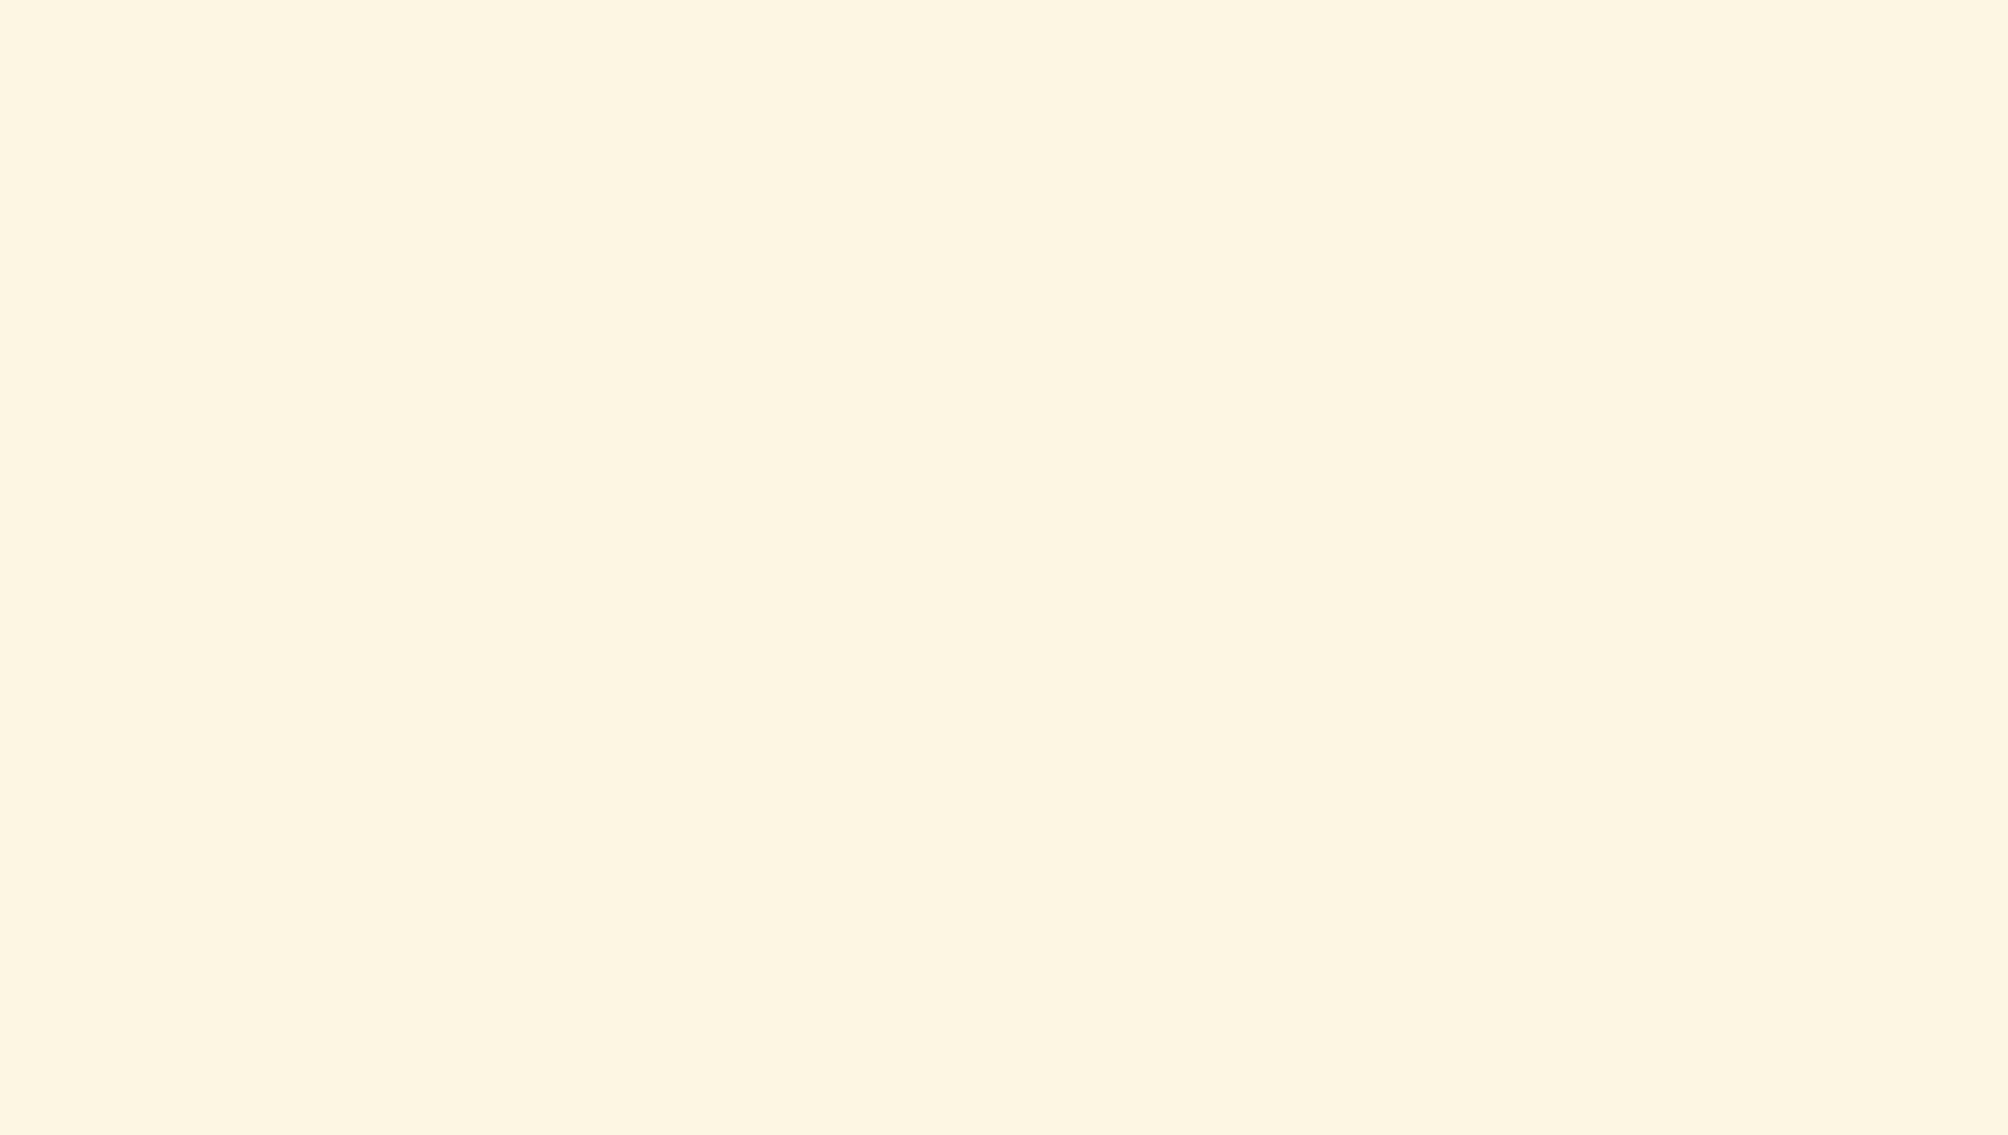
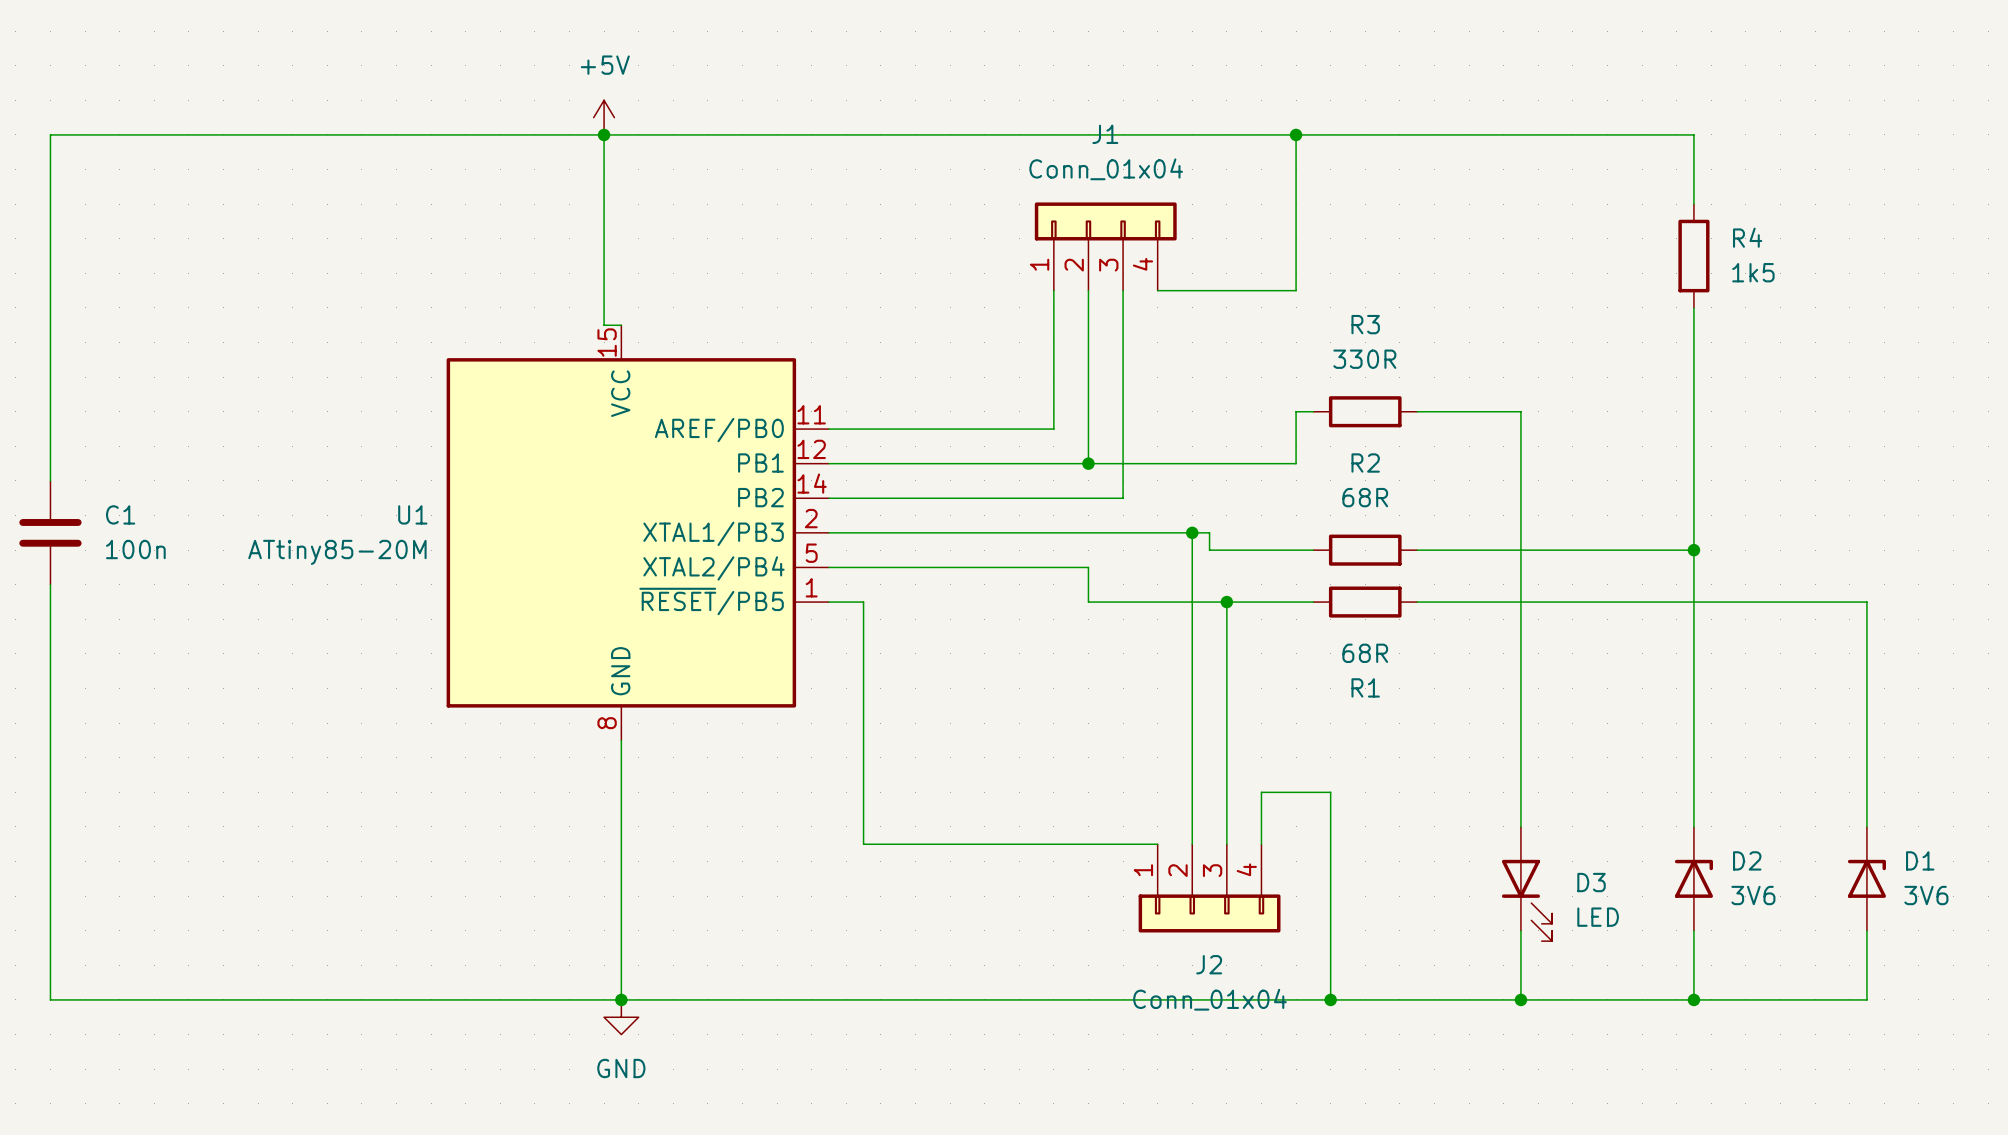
power symbol: none -> +5V (604, 117)
wire: none -> (604, 134) (604, 325) (621, 325)
junction: none -> (604, 134)
wire: none -> (1296, 134) (1296, 290) (1157, 290)
junction: none -> (1296, 134)
wire: none -> (1693, 204) (1693, 134) (50, 134) (50, 480)
J1: none -> Conn_01x04 (1105, 246)
R4: none -> 1k5 (1693, 256)
wire: none -> (1053, 290) (1053, 429) (828, 429)
wire: none -> (1088, 290) (1088, 463)
wire: none -> (1123, 290) (1123, 498) (828, 498)
wire: none -> (1693, 307) (1693, 826)
wire: none -> (1313, 411) (1296, 411) (1296, 463) (828, 463)
R3: none -> 330R (1365, 411)
wire: none -> (1417, 411) (1520, 411) (1520, 826)
junction: none -> (1088, 463)
C1: none -> 100n (50, 532)
U1: none -> ATtiny85-20M (637, 532)
wire: none -> (828, 532) (1209, 532) (1209, 550) (1313, 550)
wire: none -> (1192, 532) (1192, 844)
junction: none -> (1192, 532)
R2: none -> 68R (1365, 550)
wire: none -> (1417, 550) (1693, 550)
junction: none -> (1693, 550)
wire: none -> (828, 567) (1088, 567) (1088, 602) (1313, 602)
wire: none -> (50, 584) (50, 999) (1866, 999) (1866, 930)
wire: none -> (828, 602) (863, 602) (863, 844) (1157, 844)
wire: none -> (1226, 602) (1226, 844)
junction: none -> (1226, 602)
R1: none -> 68R (1365, 602)
wire: none -> (1417, 602) (1866, 602) (1866, 826)
wire: none -> (621, 740) (621, 999)
wire: none -> (1261, 844) (1261, 792) (1330, 792) (1330, 999)
D2: none -> 3V6 (1693, 878)
D1: none -> 3V6 (1866, 878)
D3: none -> LED (1527, 884)
J2: none -> Conn_01x04 (1209, 888)
wire: none -> (1520, 930) (1520, 999)
wire: none -> (1693, 930) (1693, 999)
junction: none -> (621, 999)
junction: none -> (1330, 999)
junction: none -> (1520, 999)
junction: none -> (1693, 999)
power symbol: none -> GND (621, 1017)

